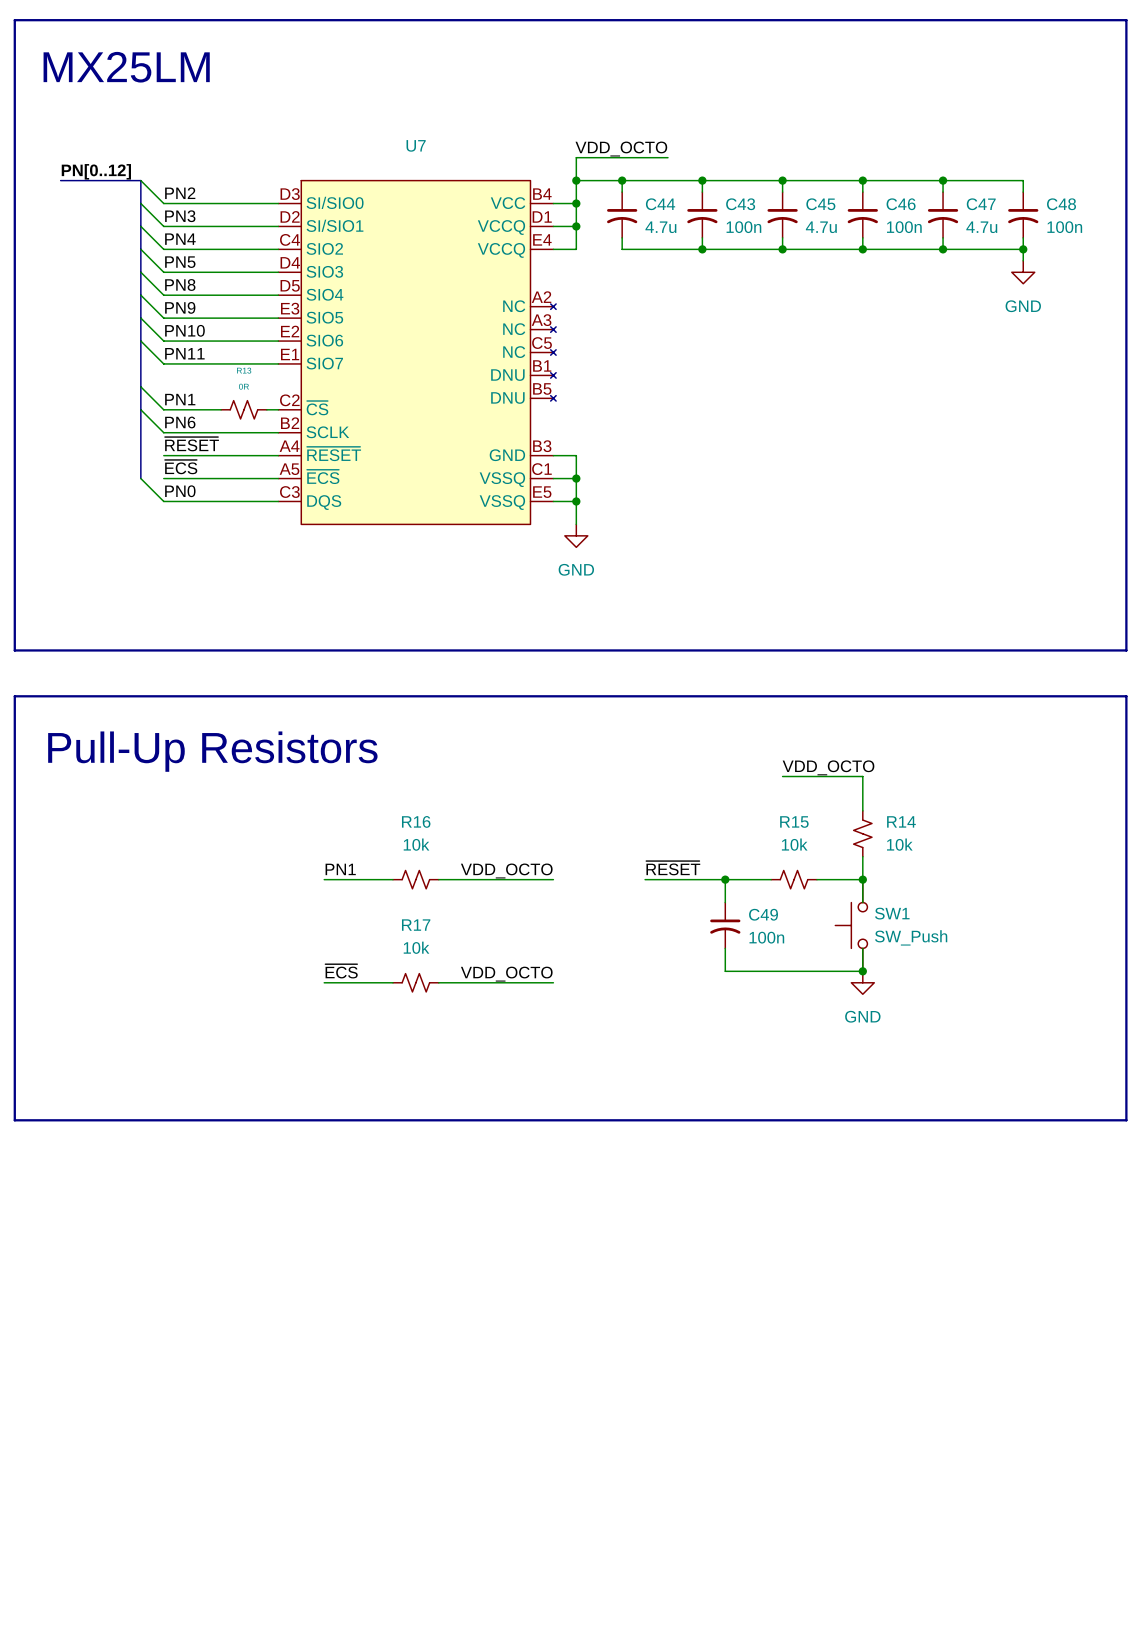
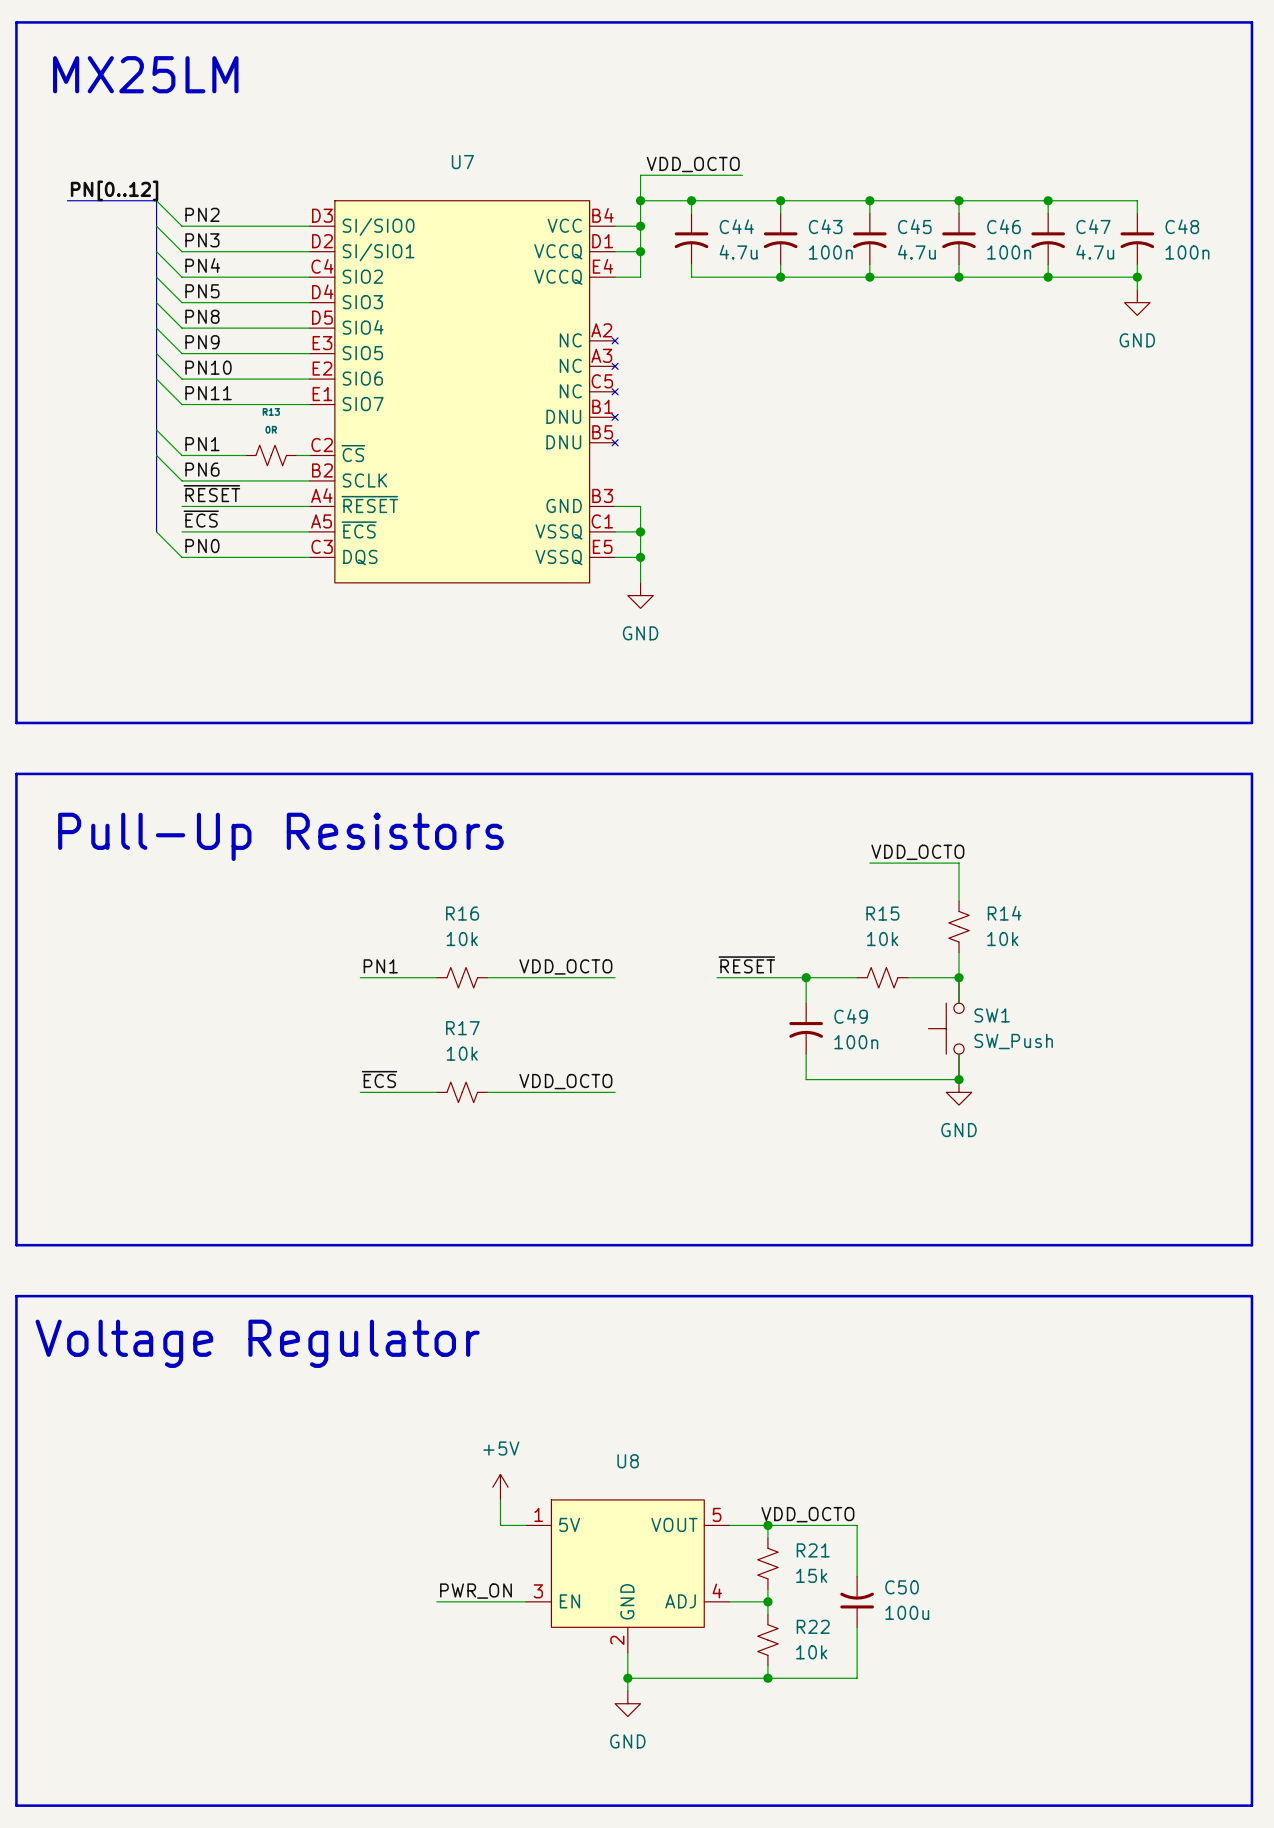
line: none -> (16, 1296) (1251, 1296) (1251, 1805) (16, 1805) (16, 1296)
text: none -> Voltage Regulator (257, 1343)
power symbol: none -> +5V (500, 1487)
wire: none -> (500, 1499) (500, 1525) (525, 1525)
label: none -> VDD_OCTO (807, 1514)
wire: none -> (729, 1525) (857, 1525) (857, 1576)
wire: none -> (767, 1525) (767, 1538)
junction: none -> (767, 1525)
R21: none -> 15k (767, 1563)
U8: none -> (627, 1576)
wire: none -> (767, 1589) (767, 1614)
label: none -> PWR_ON (475, 1591)
wire: none -> (436, 1601) (525, 1601)
wire: none -> (729, 1601) (767, 1601)
junction: none -> (767, 1601)
C50: none -> 100u (857, 1601)
wire: none -> (857, 1627) (857, 1678) (627, 1678)
R22: none -> 10k (767, 1640)
wire: none -> (627, 1652) (627, 1691)
wire: none -> (767, 1665) (767, 1678)
junction: none -> (627, 1678)
junction: none -> (767, 1678)
power symbol: none -> GND (627, 1703)

